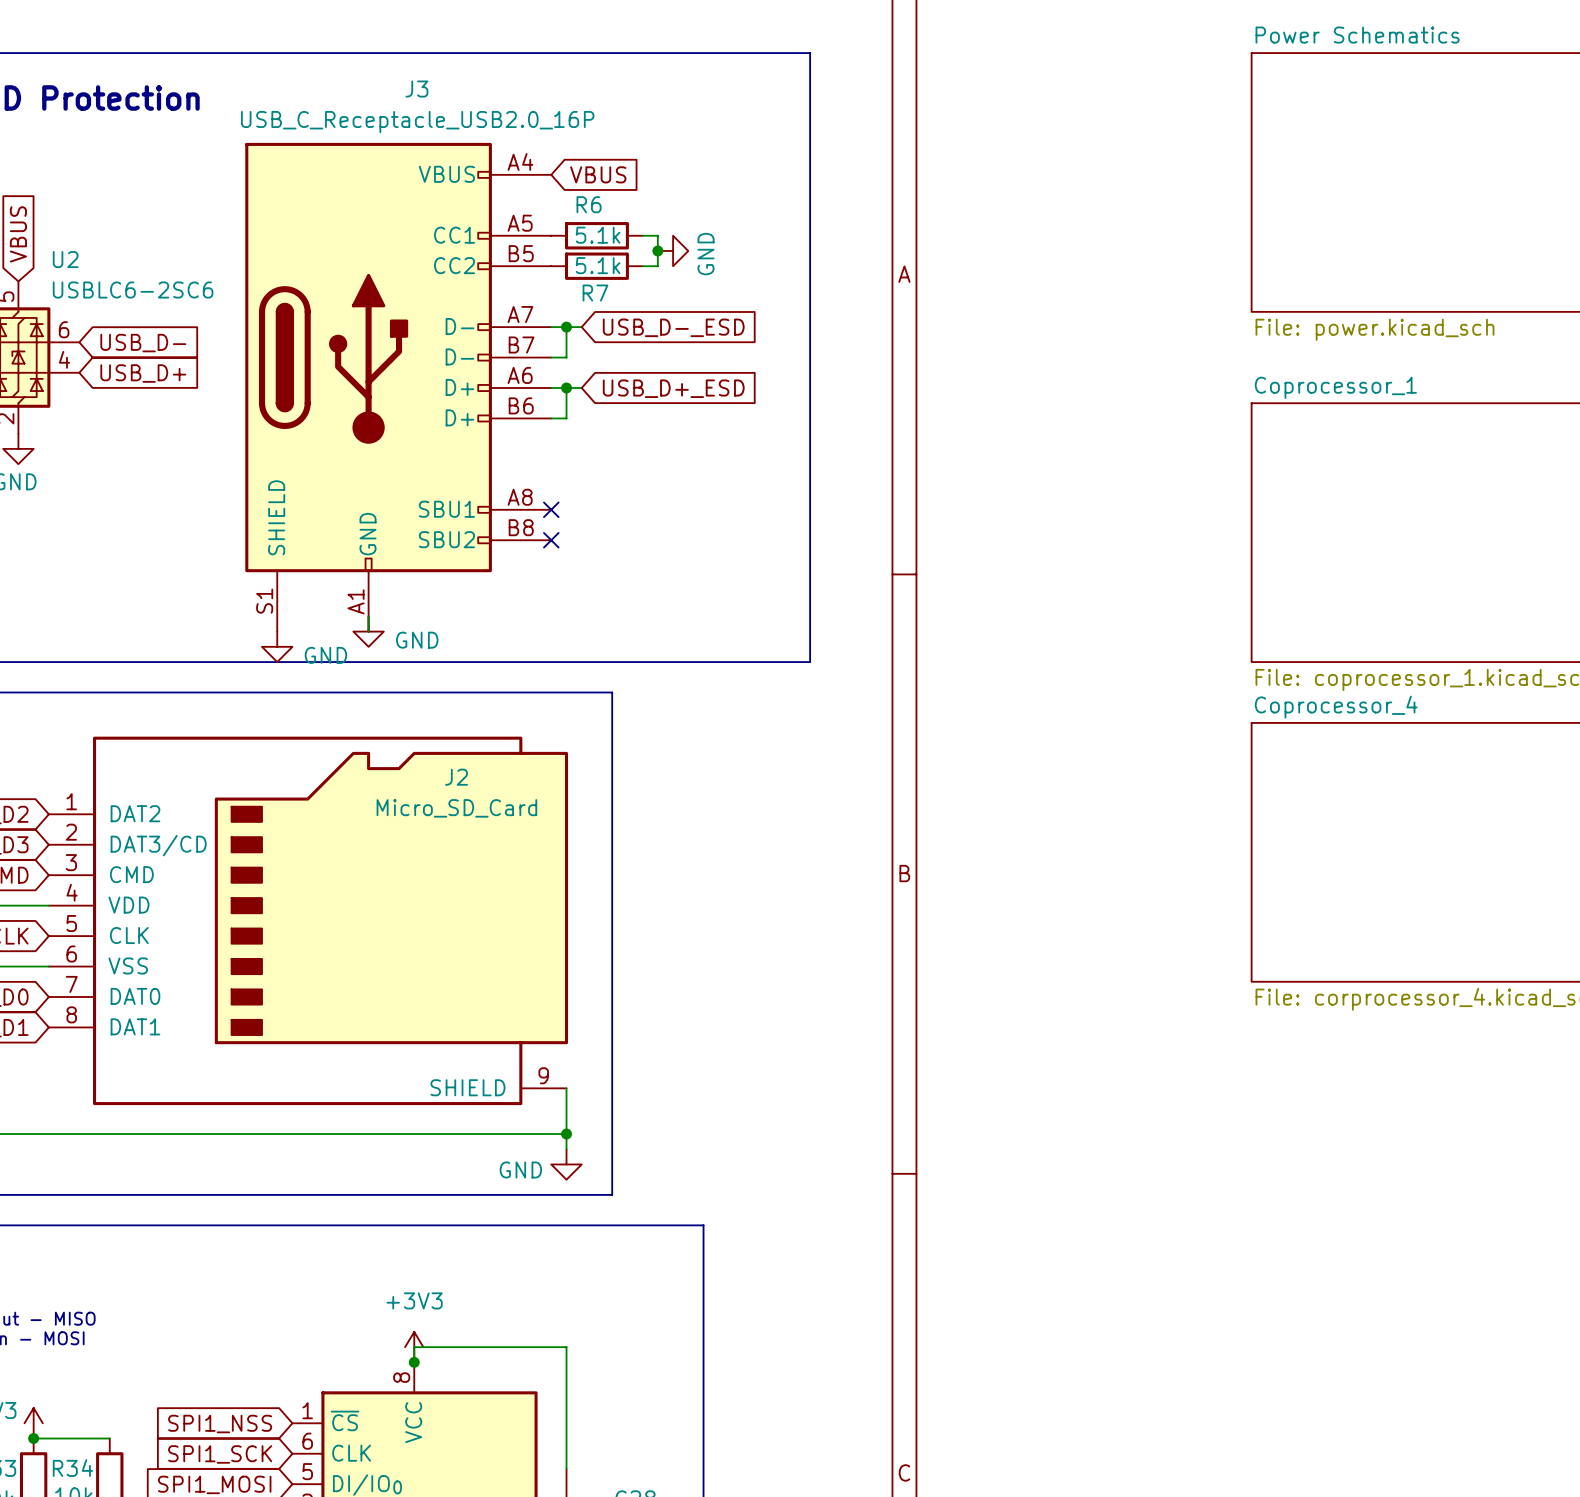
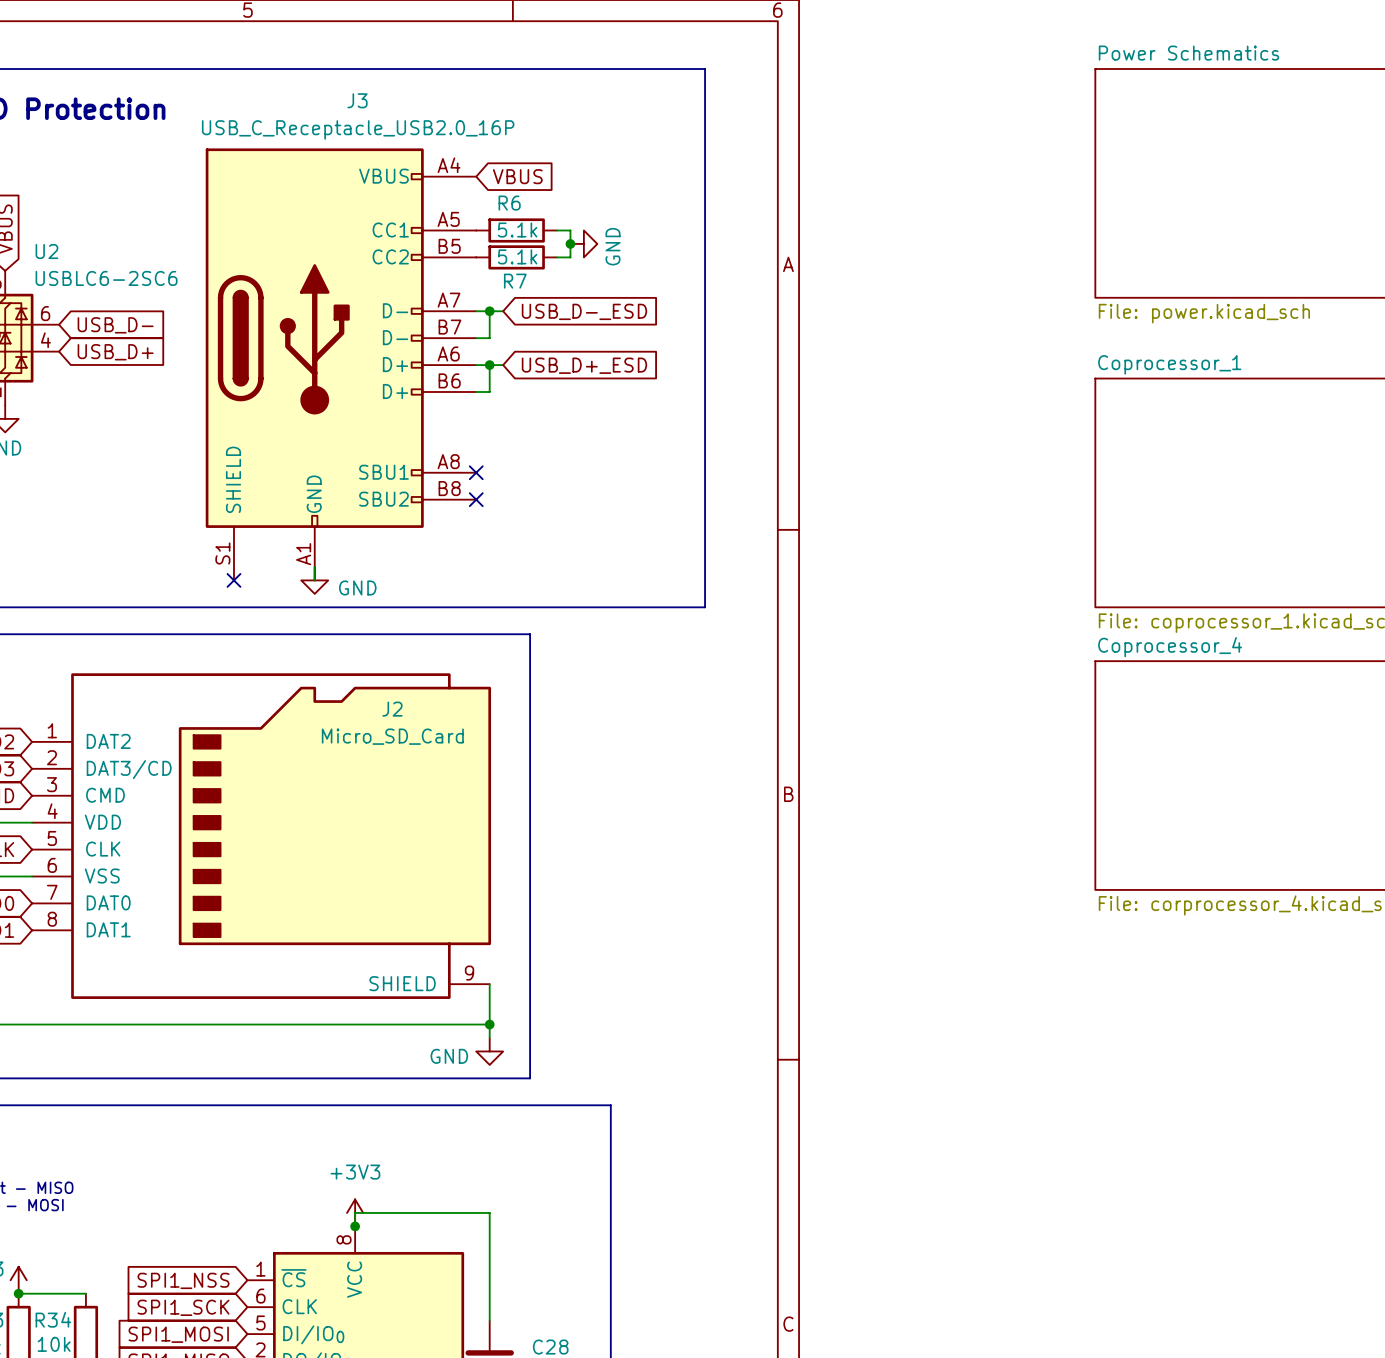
no-connect mark: none -> (233, 580)
power symbol: GND (277, 646) -> none

